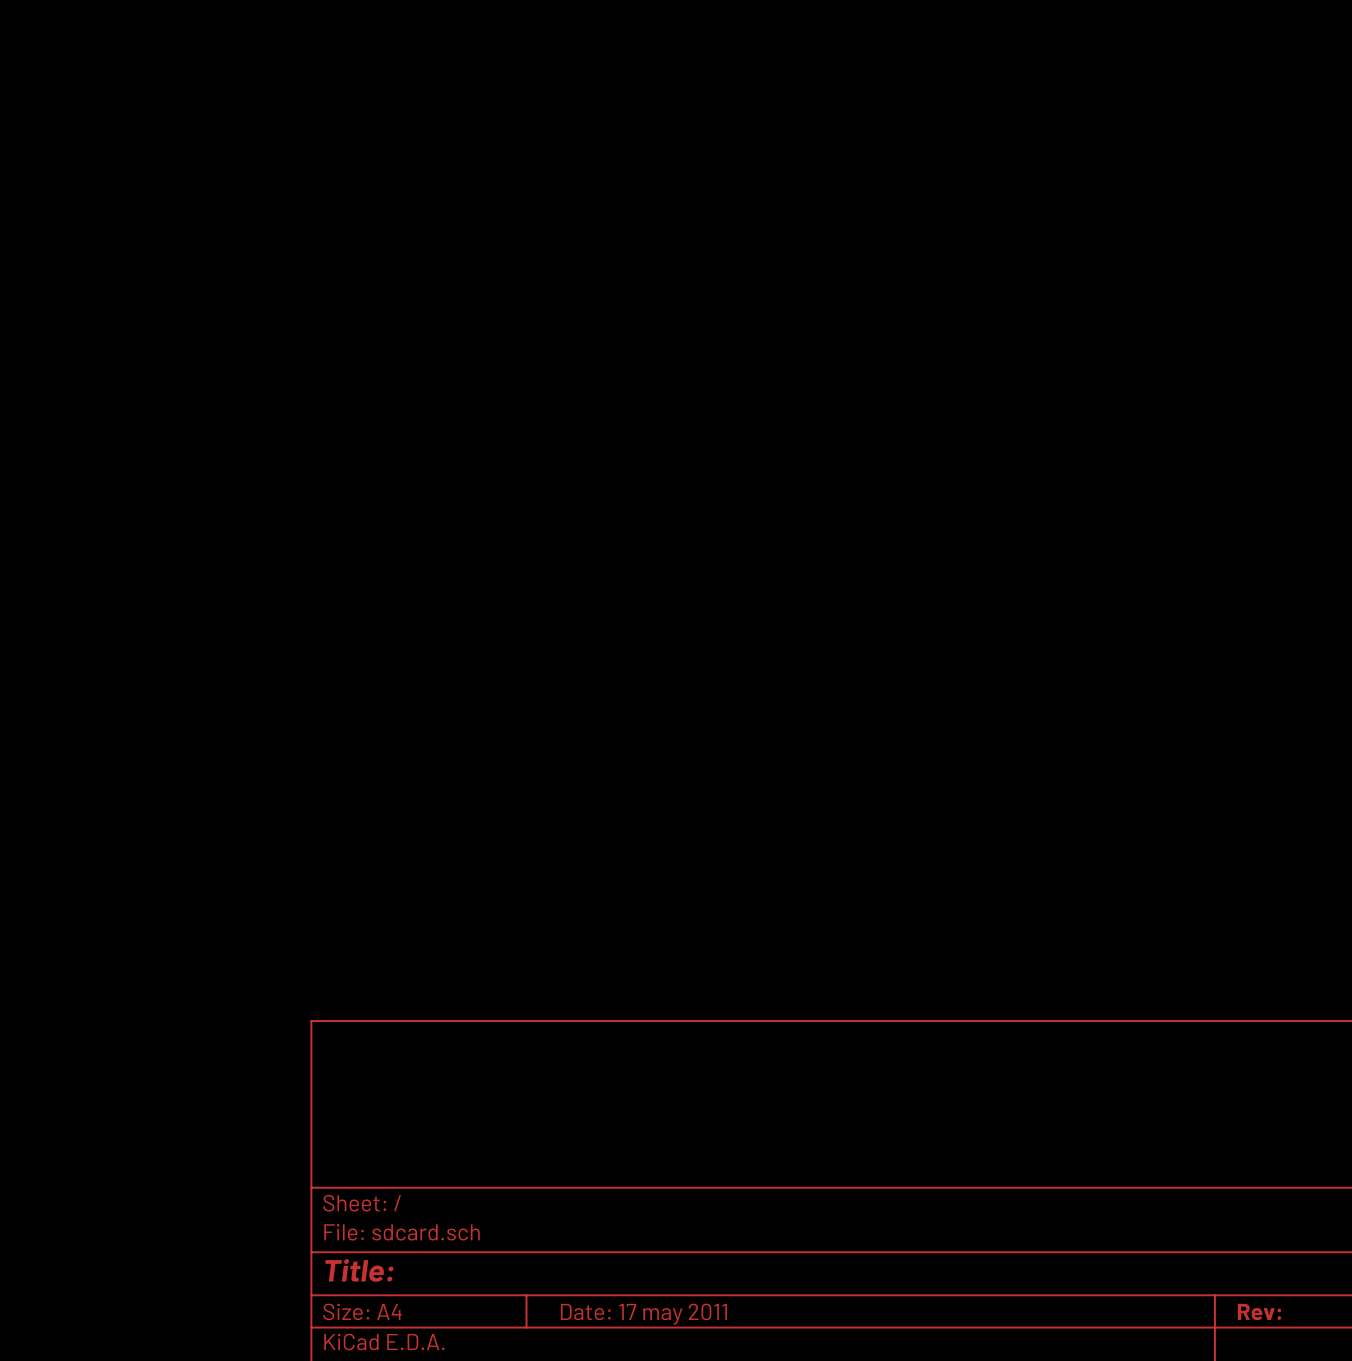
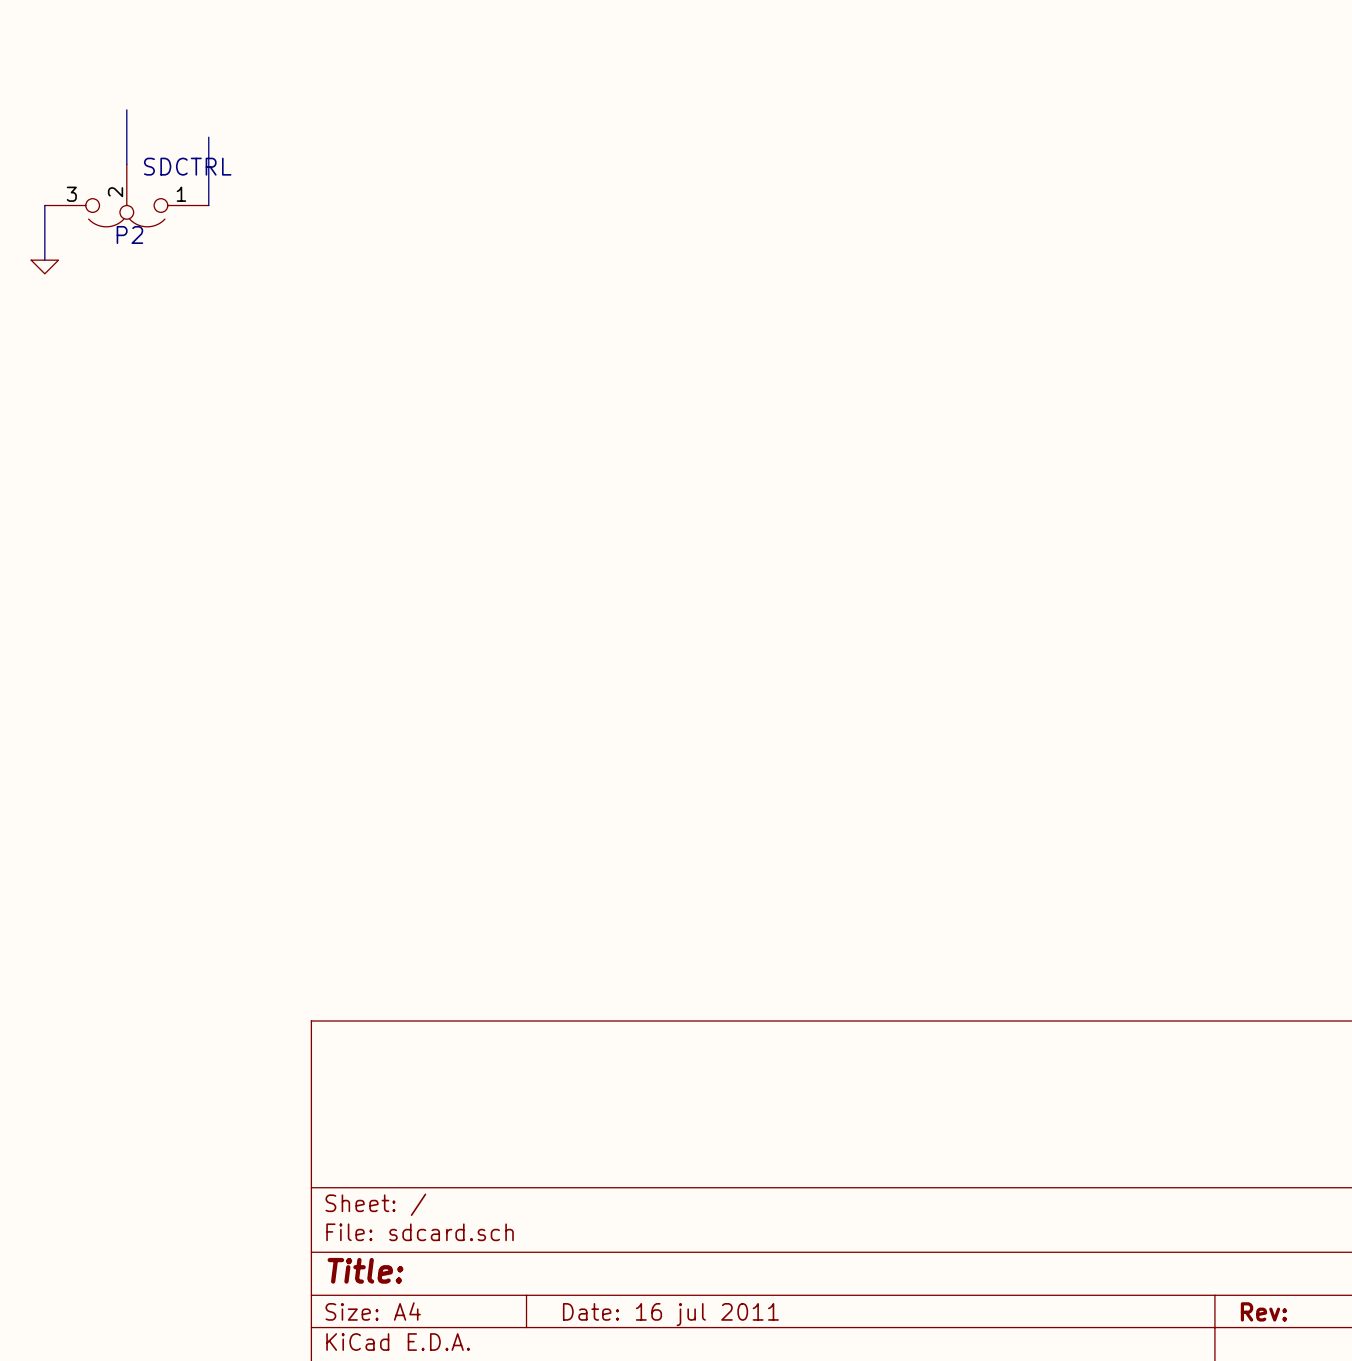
wire: none -> (126, 109) (126, 164)
wire: none -> (208, 137) (208, 205)
P2: none -> SDCTRL (126, 195)
wire: none -> (44, 205) (44, 260)
power symbol: none -> (44, 266)
title block: Date: 17 may 2011 (643, 1314) -> Date: 16 jul 2011 (670, 1314)

